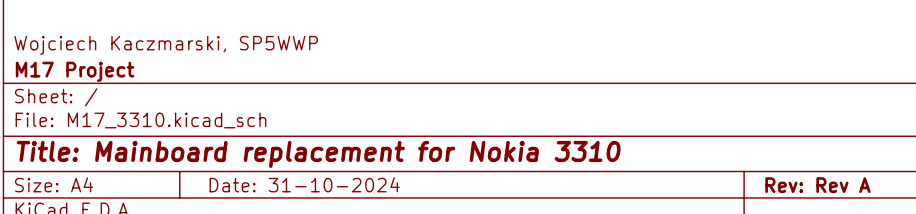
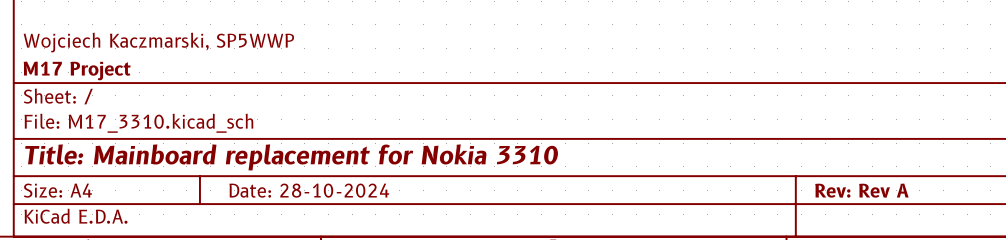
title block: Date: 31-10-2024 (304, 184) -> Date: 28-10-2024 (309, 190)

